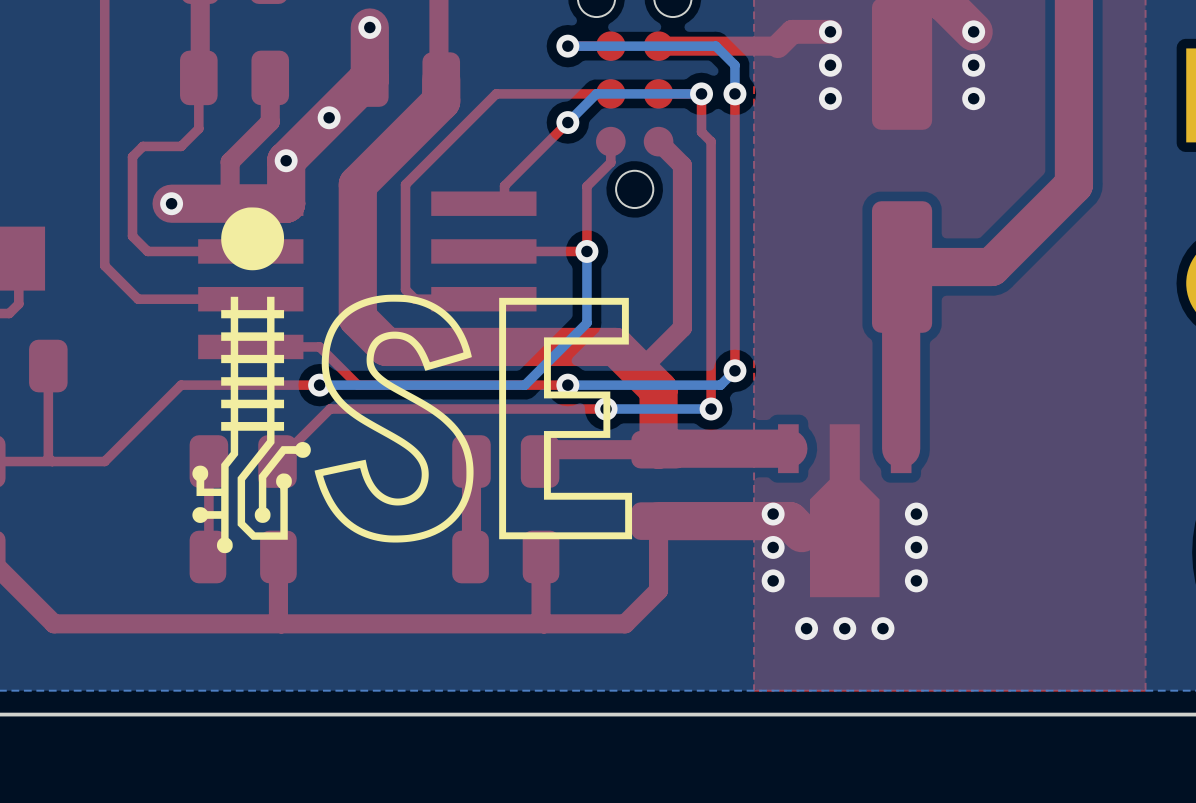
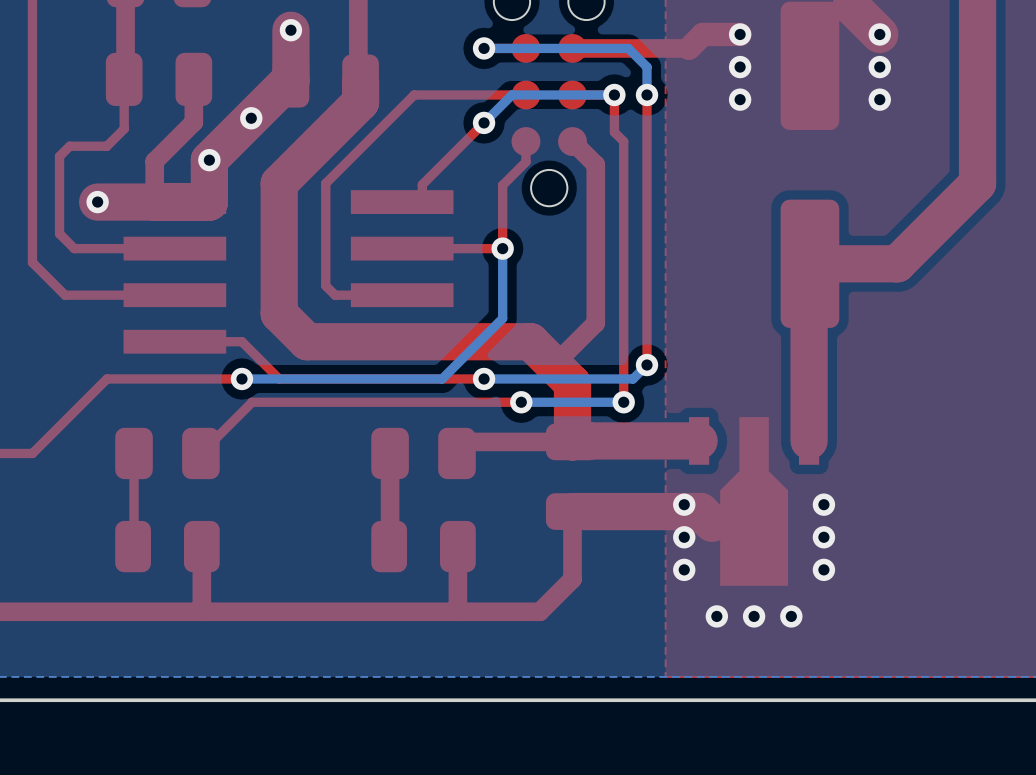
drawing: [192, 207, 633, 554] -> none

